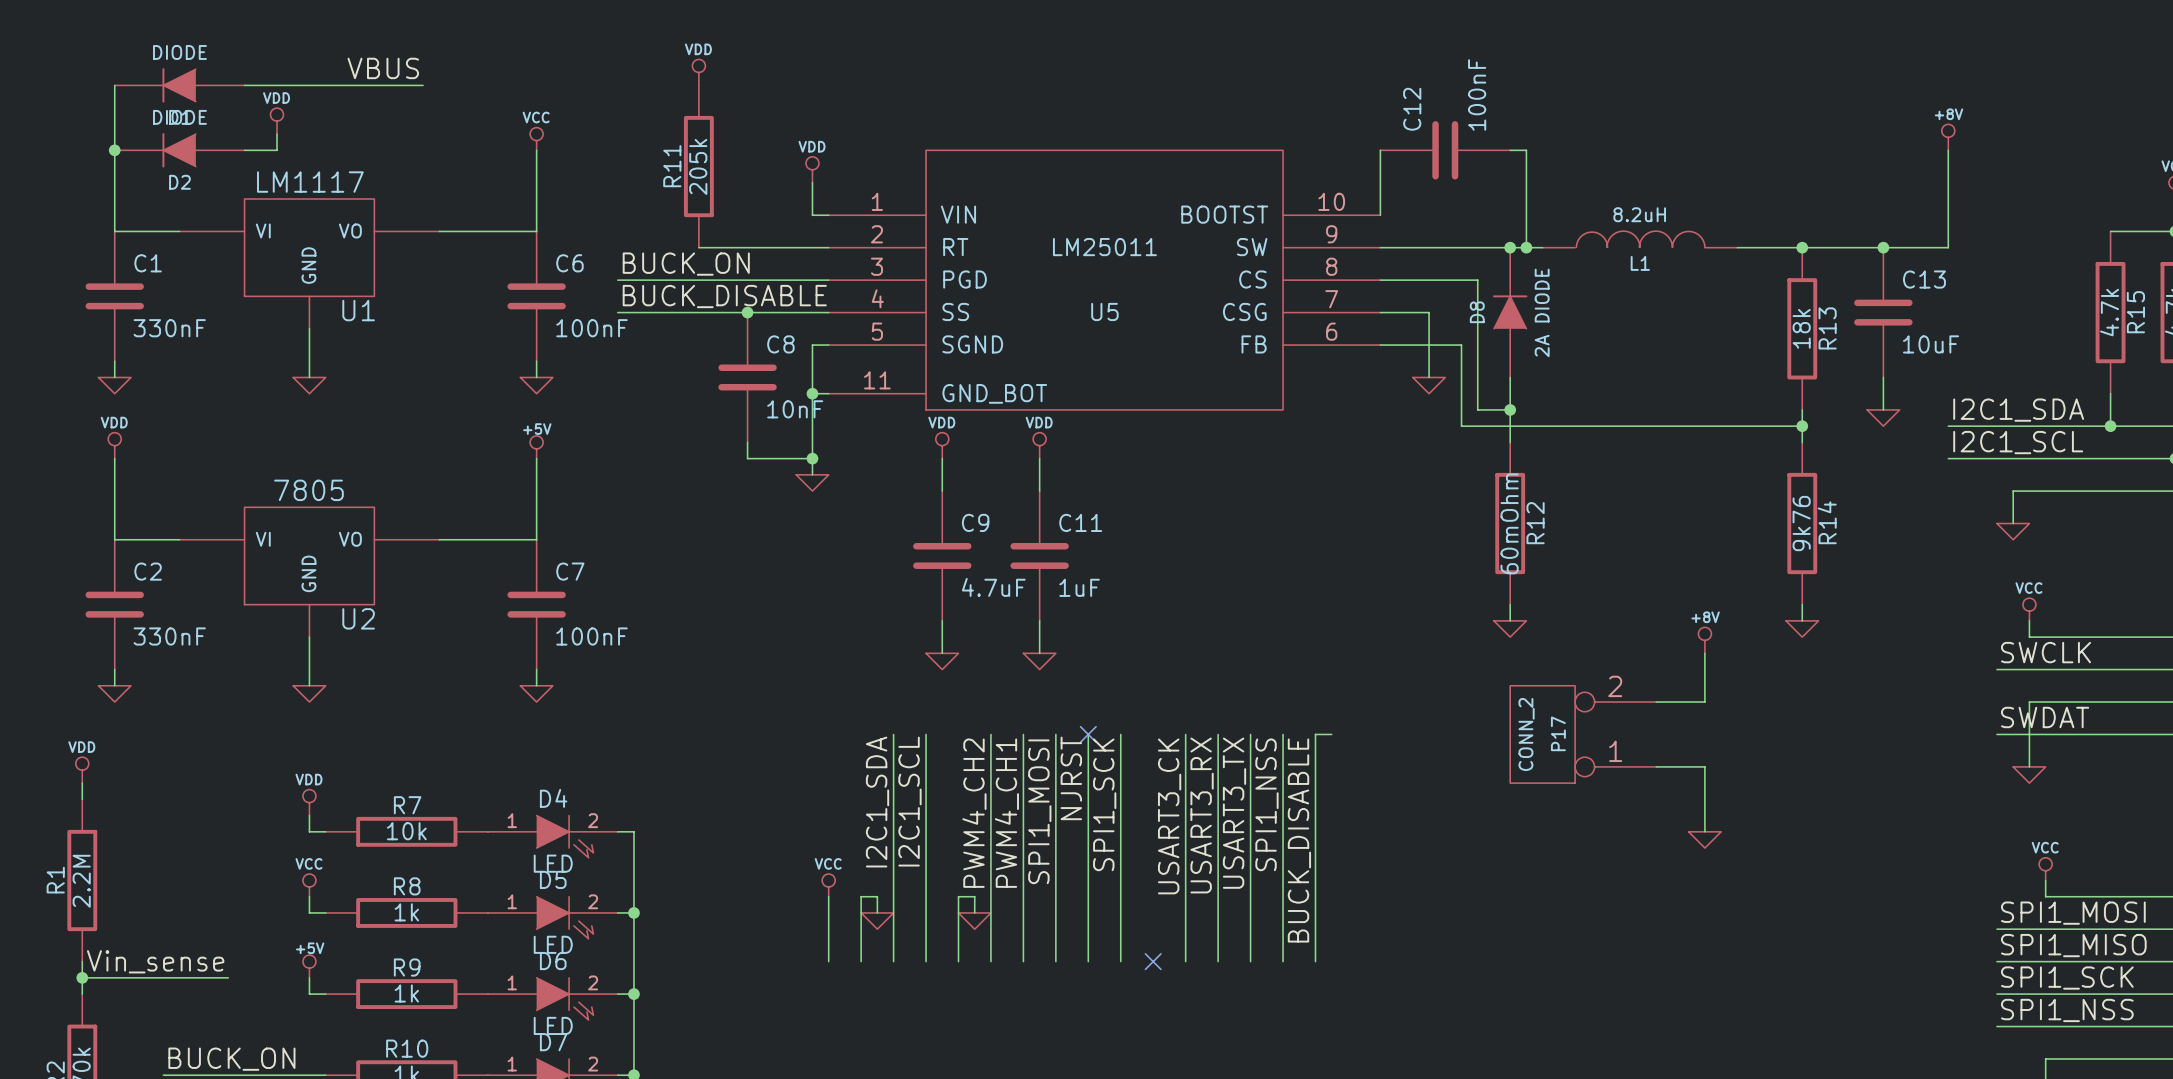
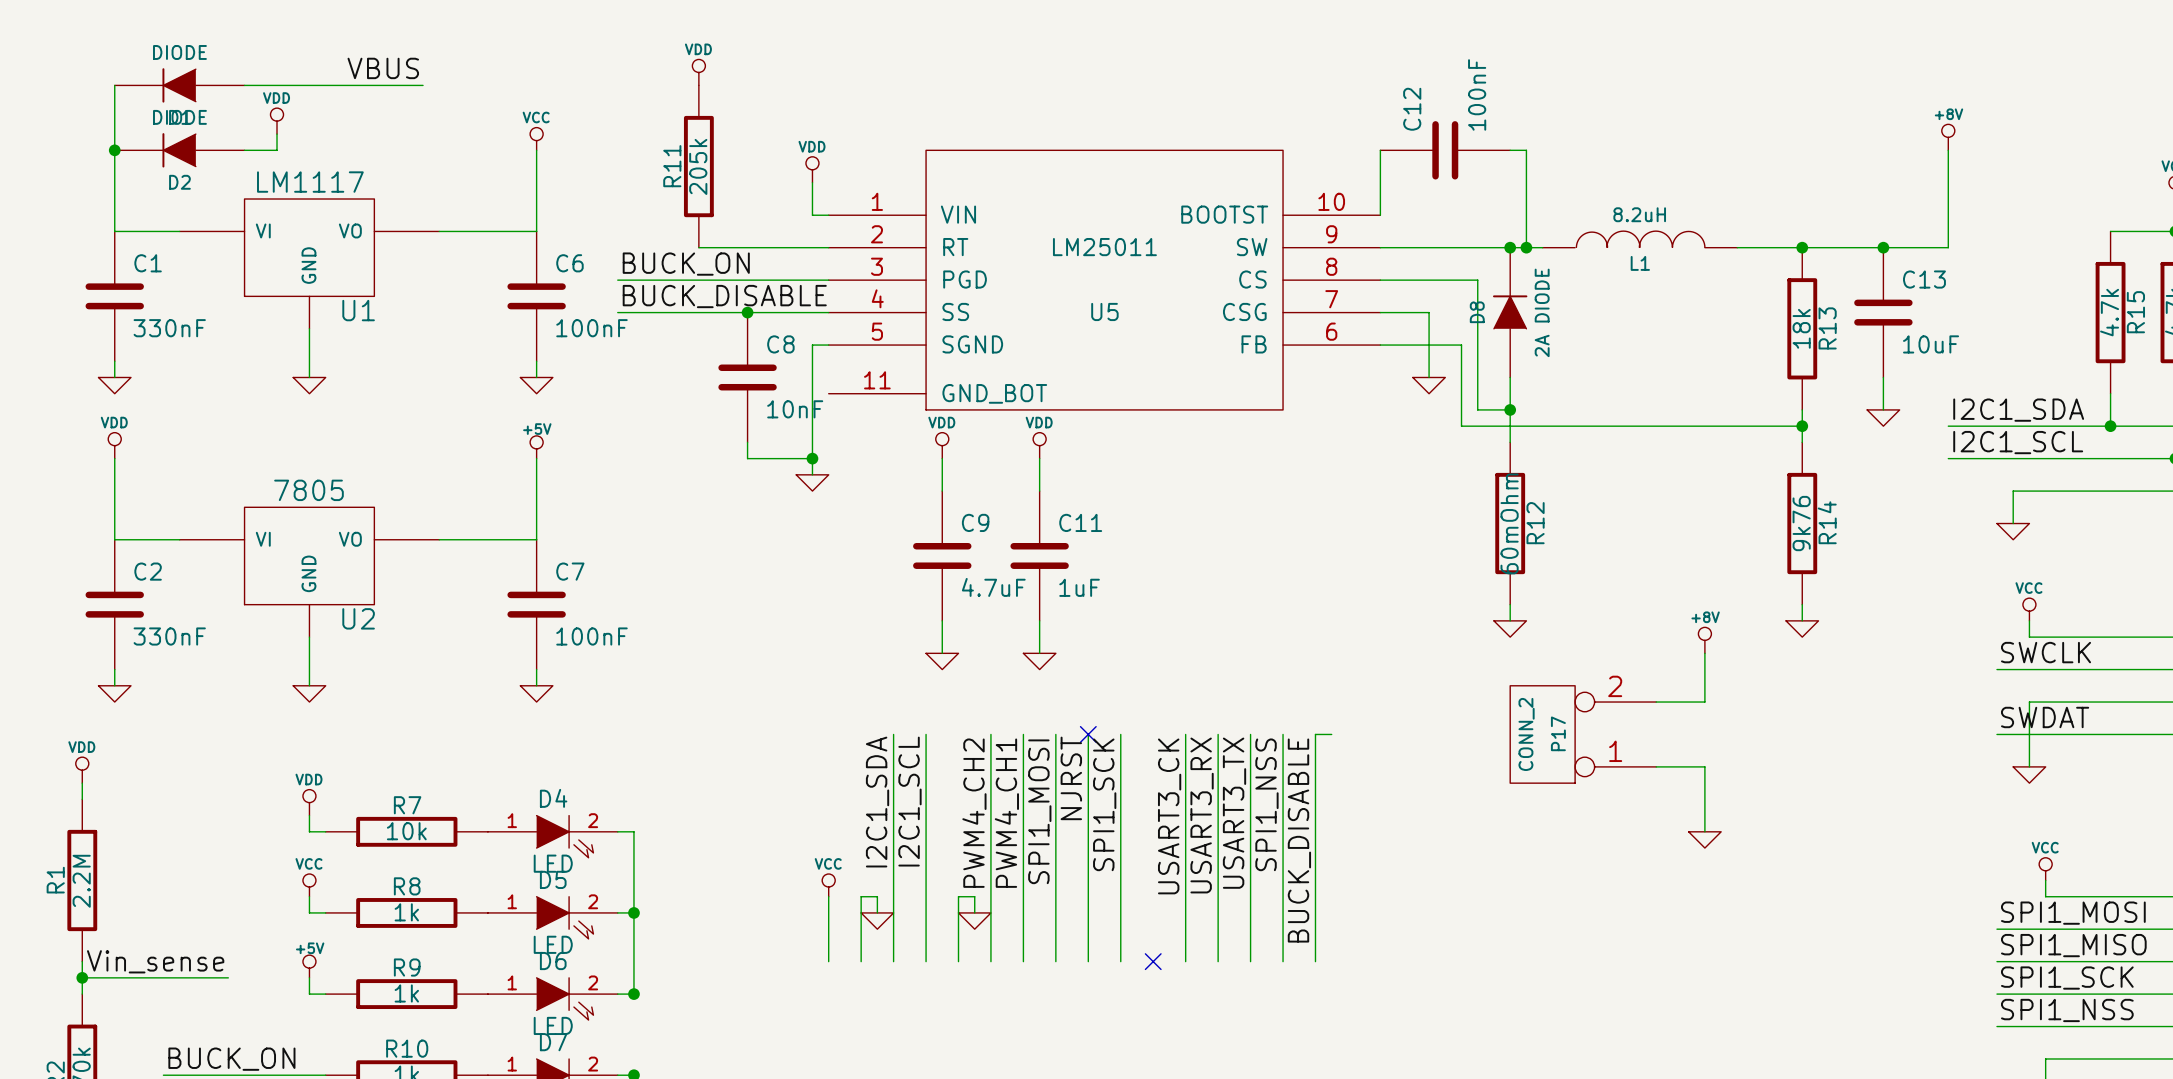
wire: (812, 393) (828, 393) -> none
junction: (812, 393) -> none
wire: (633, 994) (633, 1075) -> none

